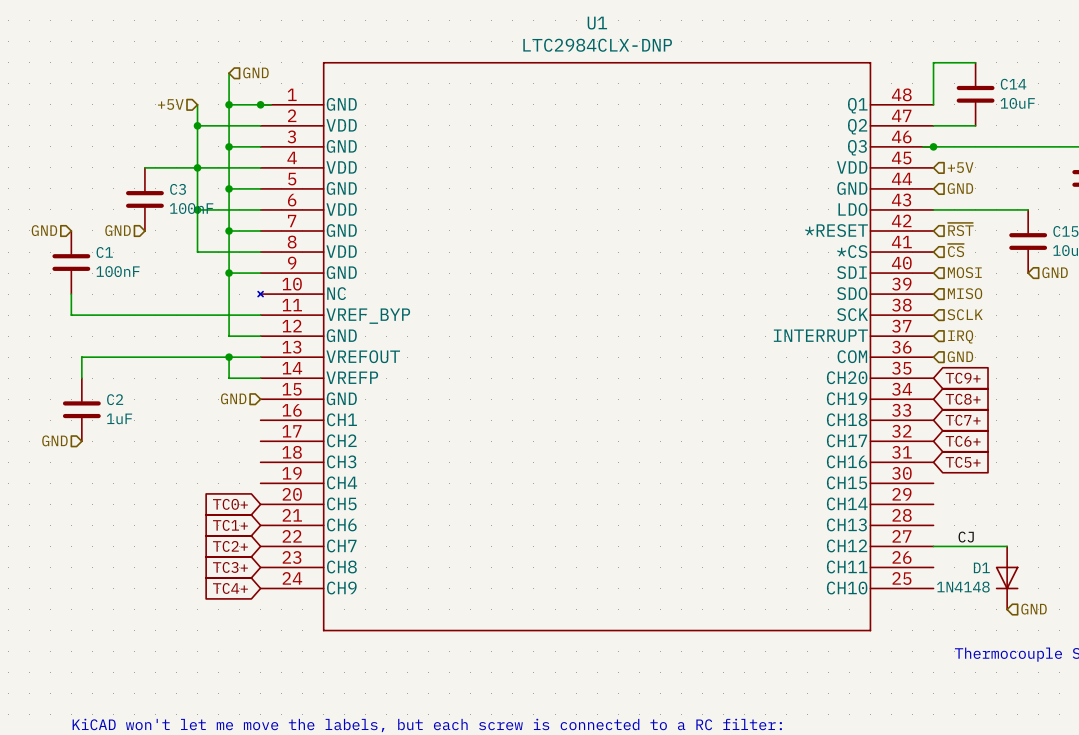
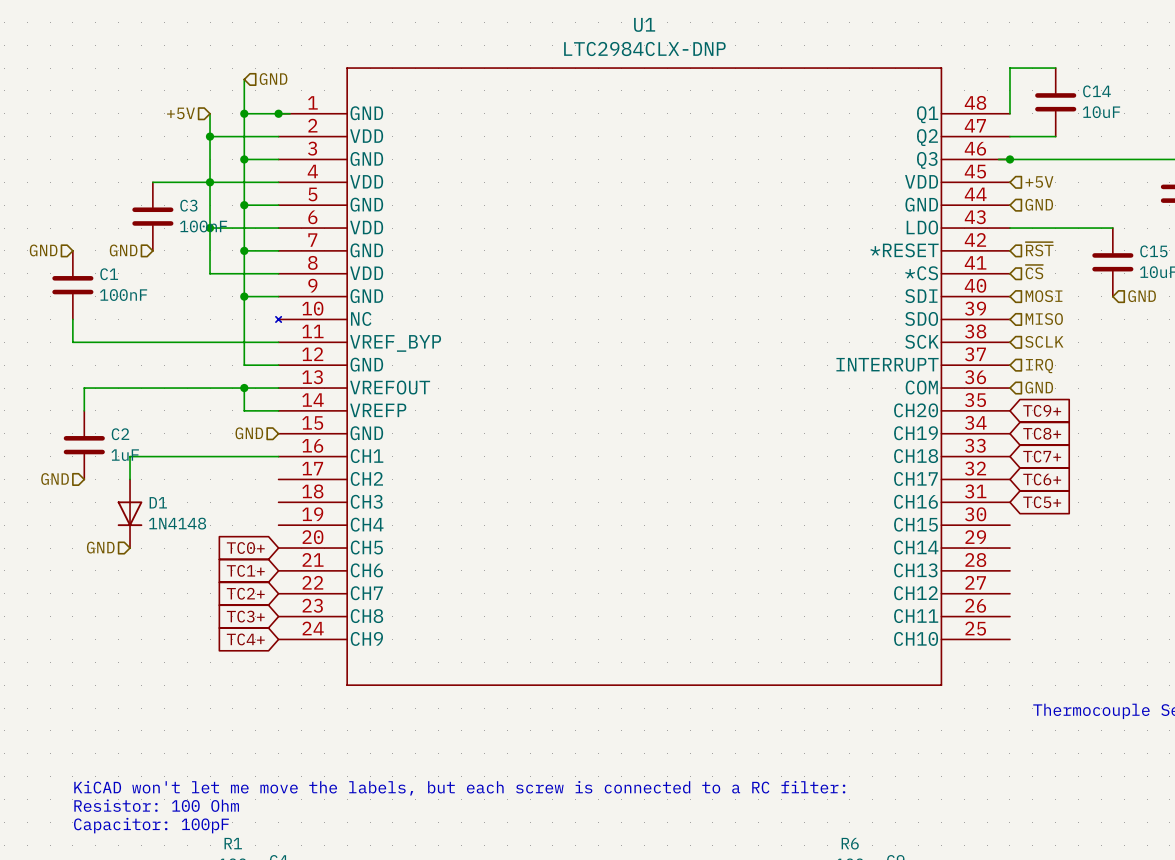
wire: none -> (278, 456) (130, 456) (130, 479)
hierarchical label: none -> GND (100, 547)
label: CJ (966, 537) -> none
wire: (933, 546) (1007, 546) -> none
D1 name position: D1 (981, 567) -> D1 (158, 502)
D1 position: (1007, 577) -> (130, 513)
D1 value position: 1N4148 (963, 587) -> 1N4148 (177, 523)
hierarchical label: GND (1034, 609) -> none

